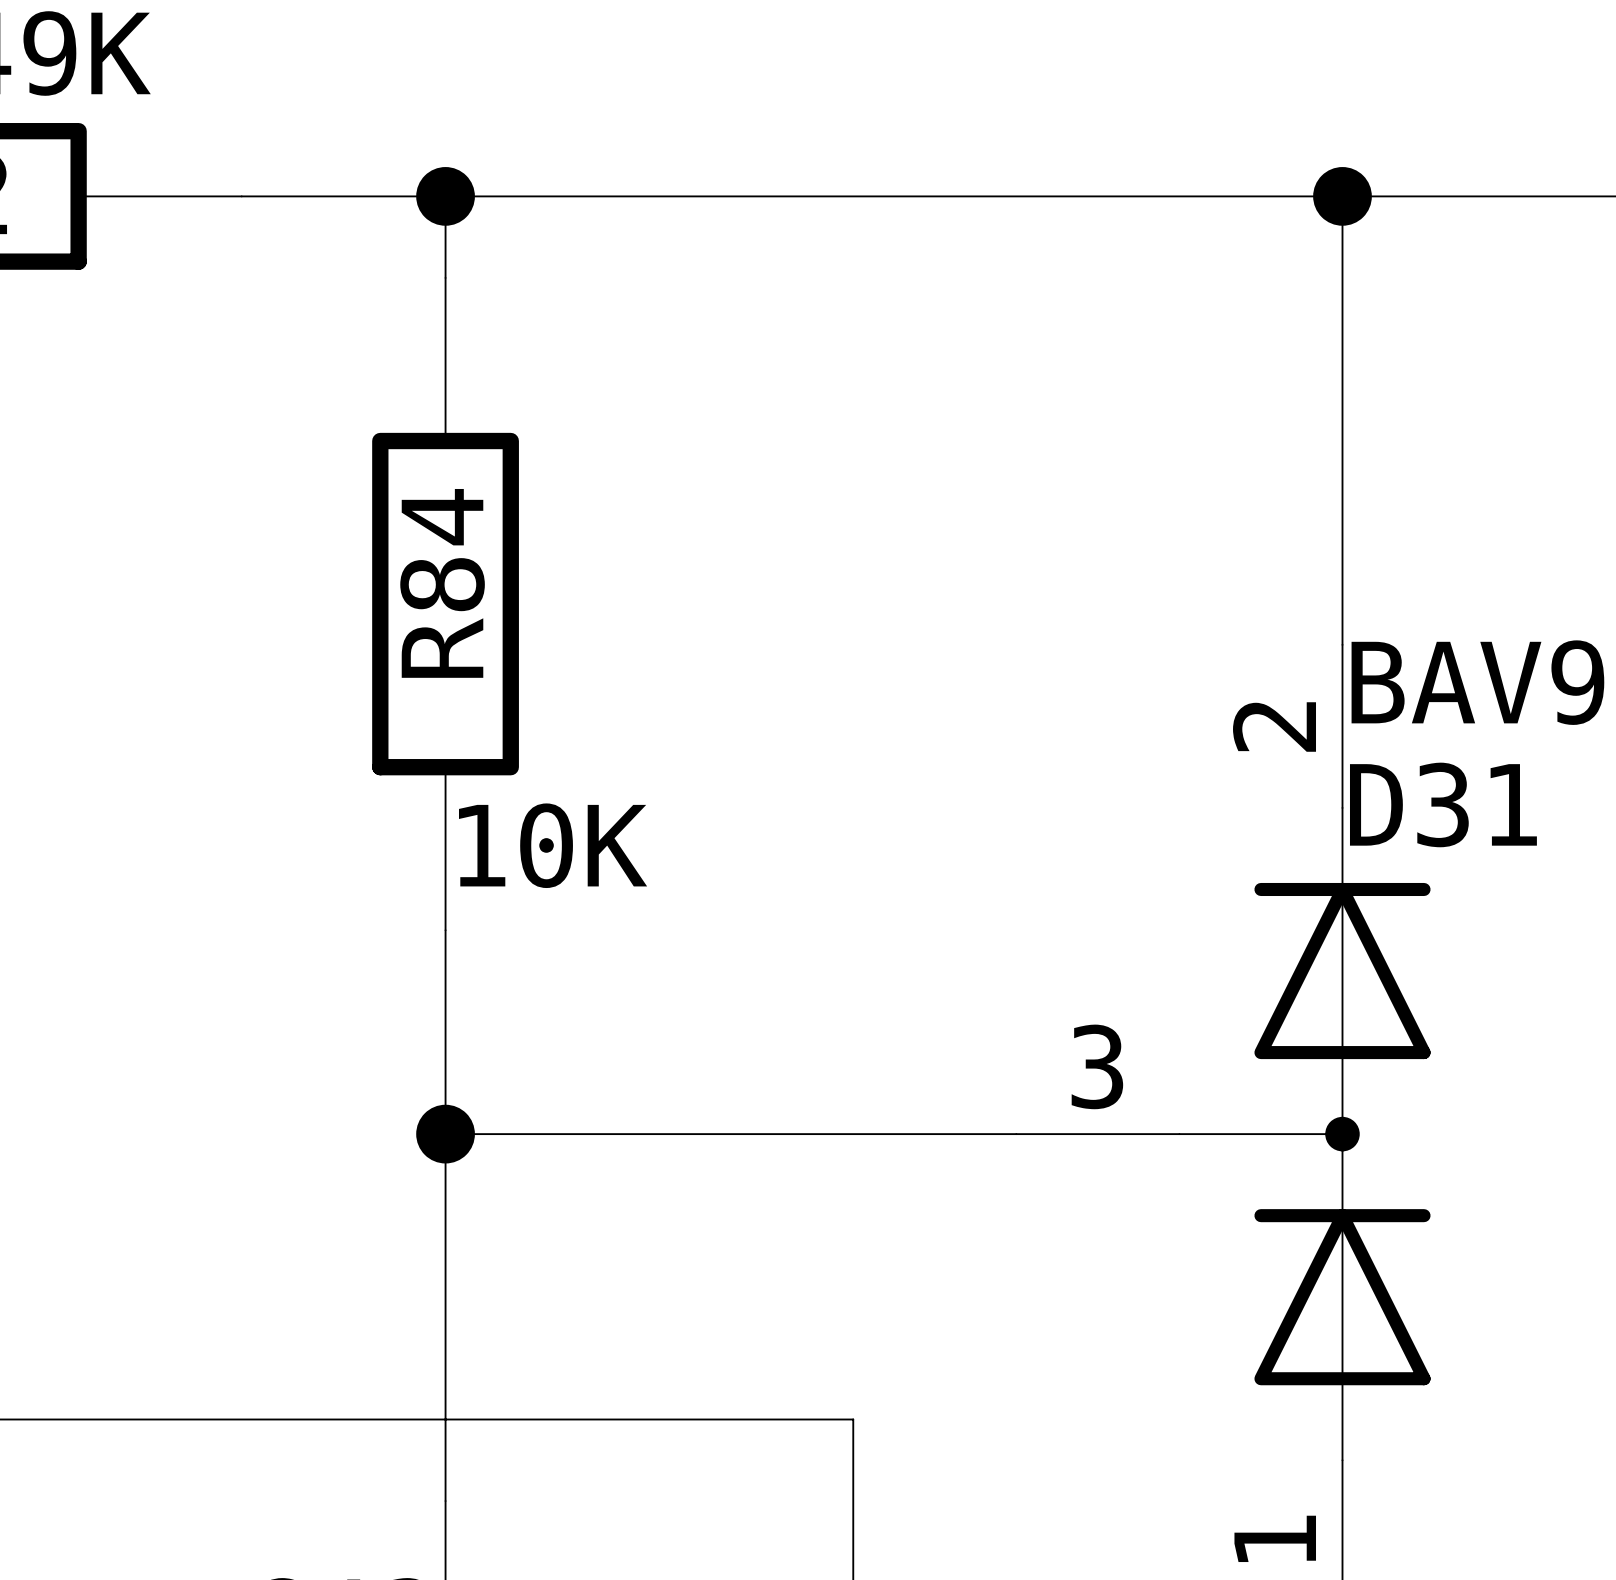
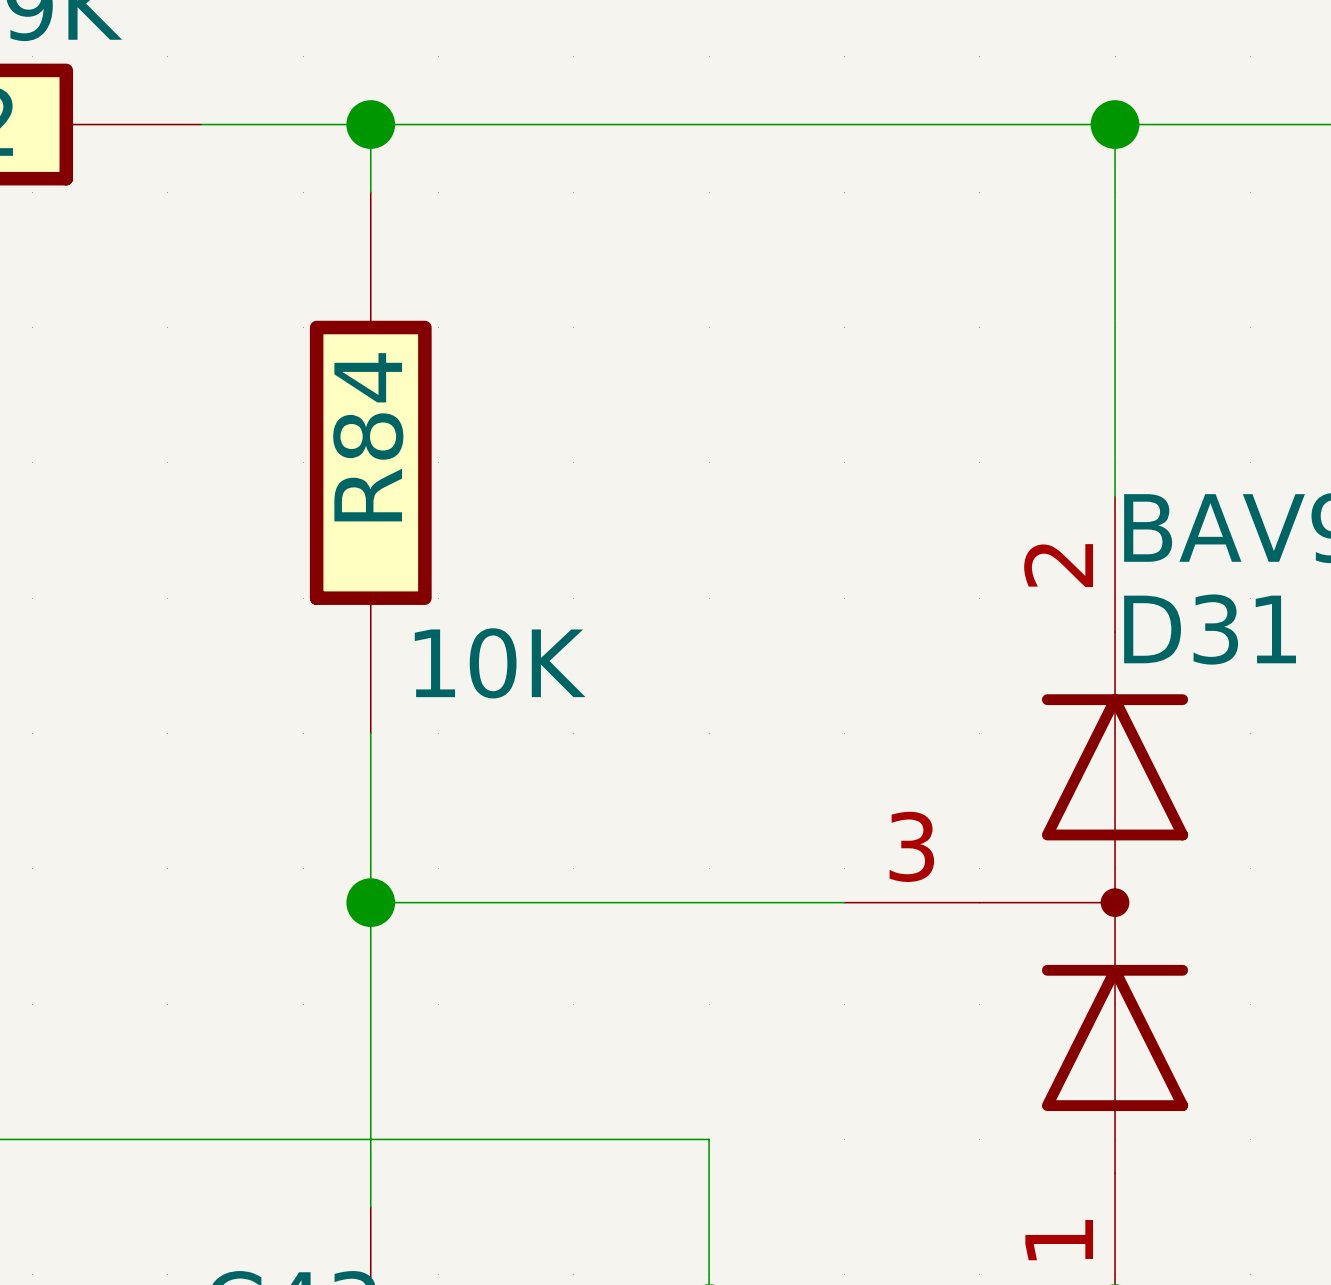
R84 value position: 10K (553, 845) -> 10K (500, 663)

